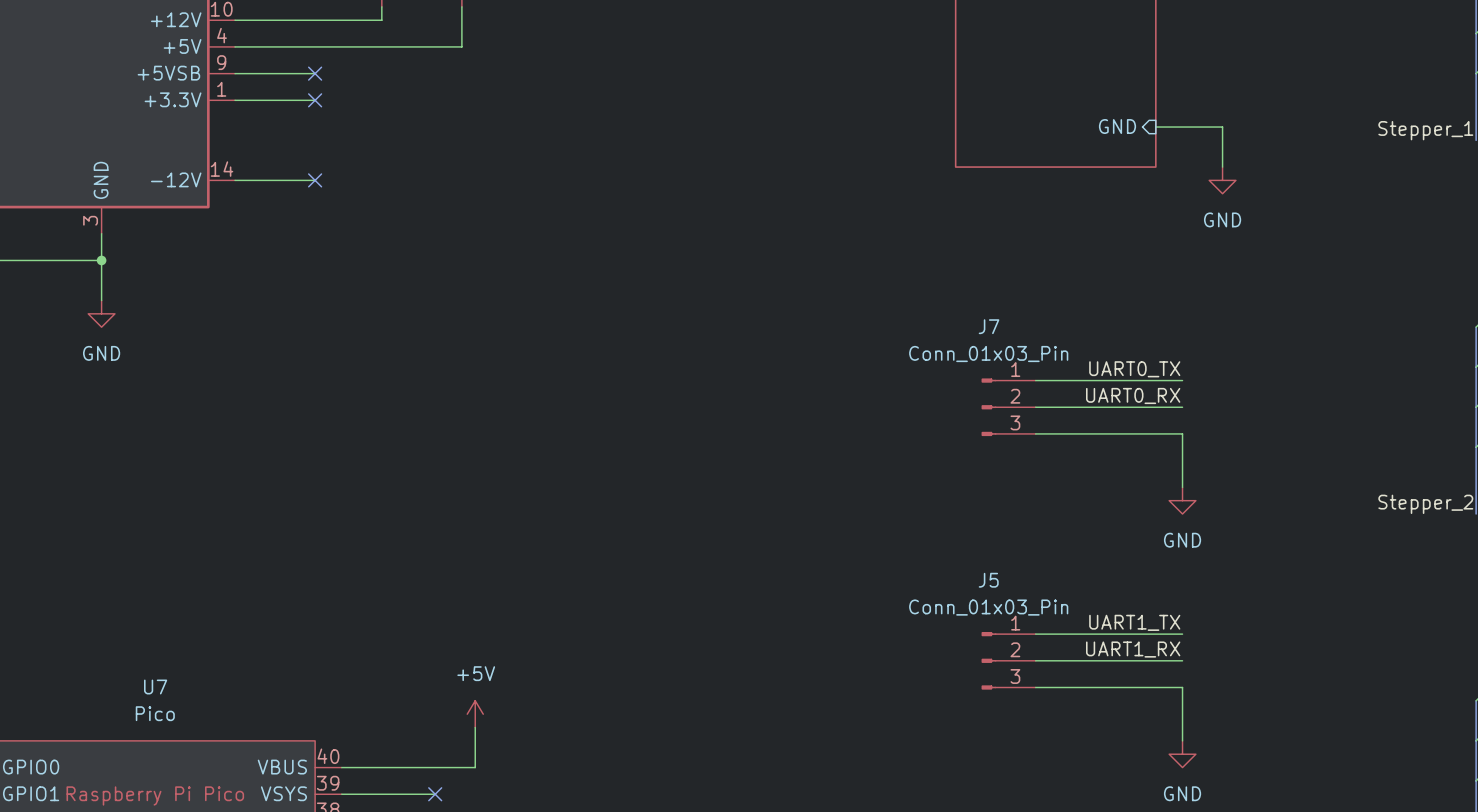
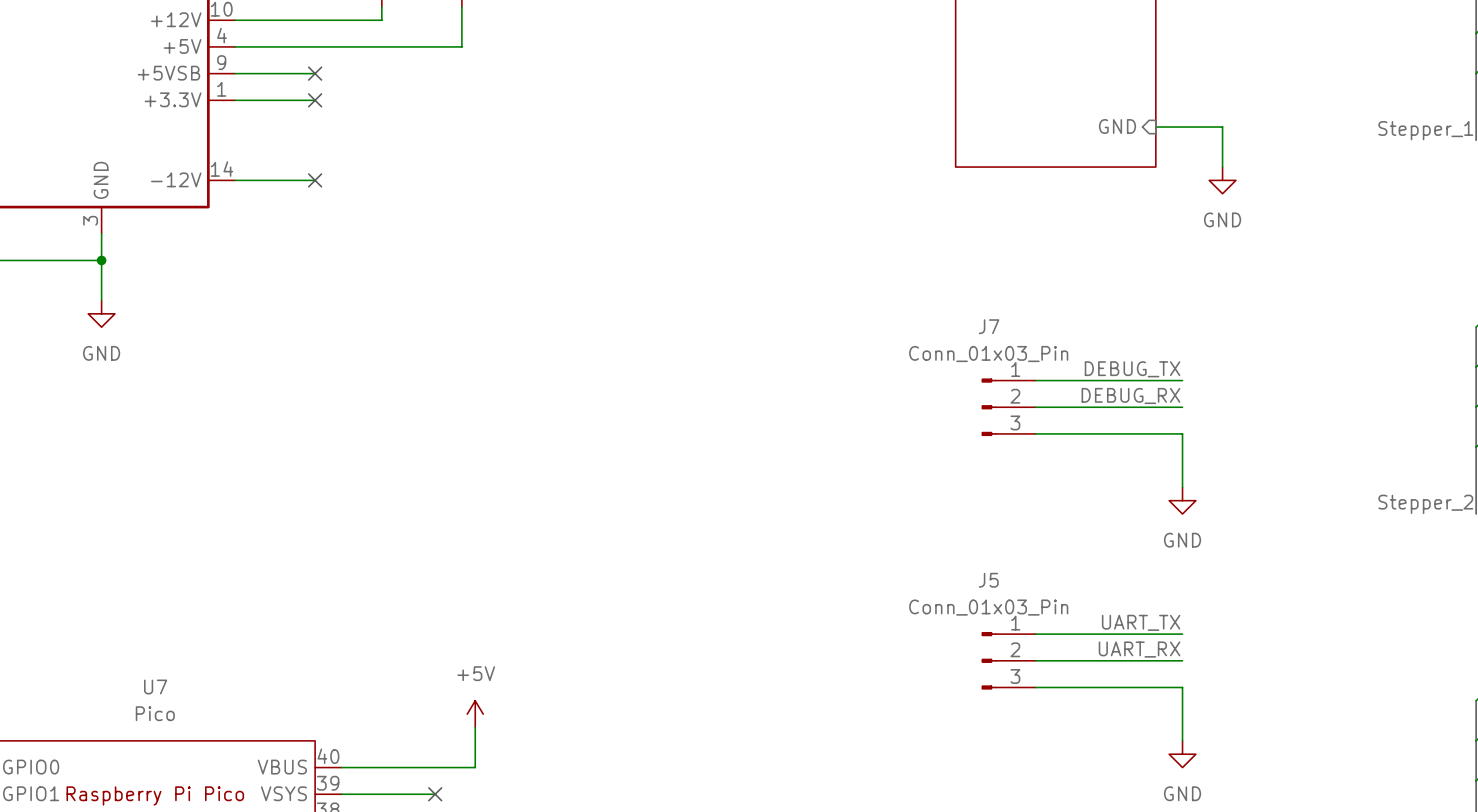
label: UART0_TX (1134, 369) -> DEBUG_TX (1132, 369)
label: UART0_RX (1133, 395) -> DEBUG_RX (1130, 395)
label: UART1_TX (1134, 622) -> UART_TX (1141, 622)
label: UART1_RX (1133, 649) -> UART_RX (1139, 649)

